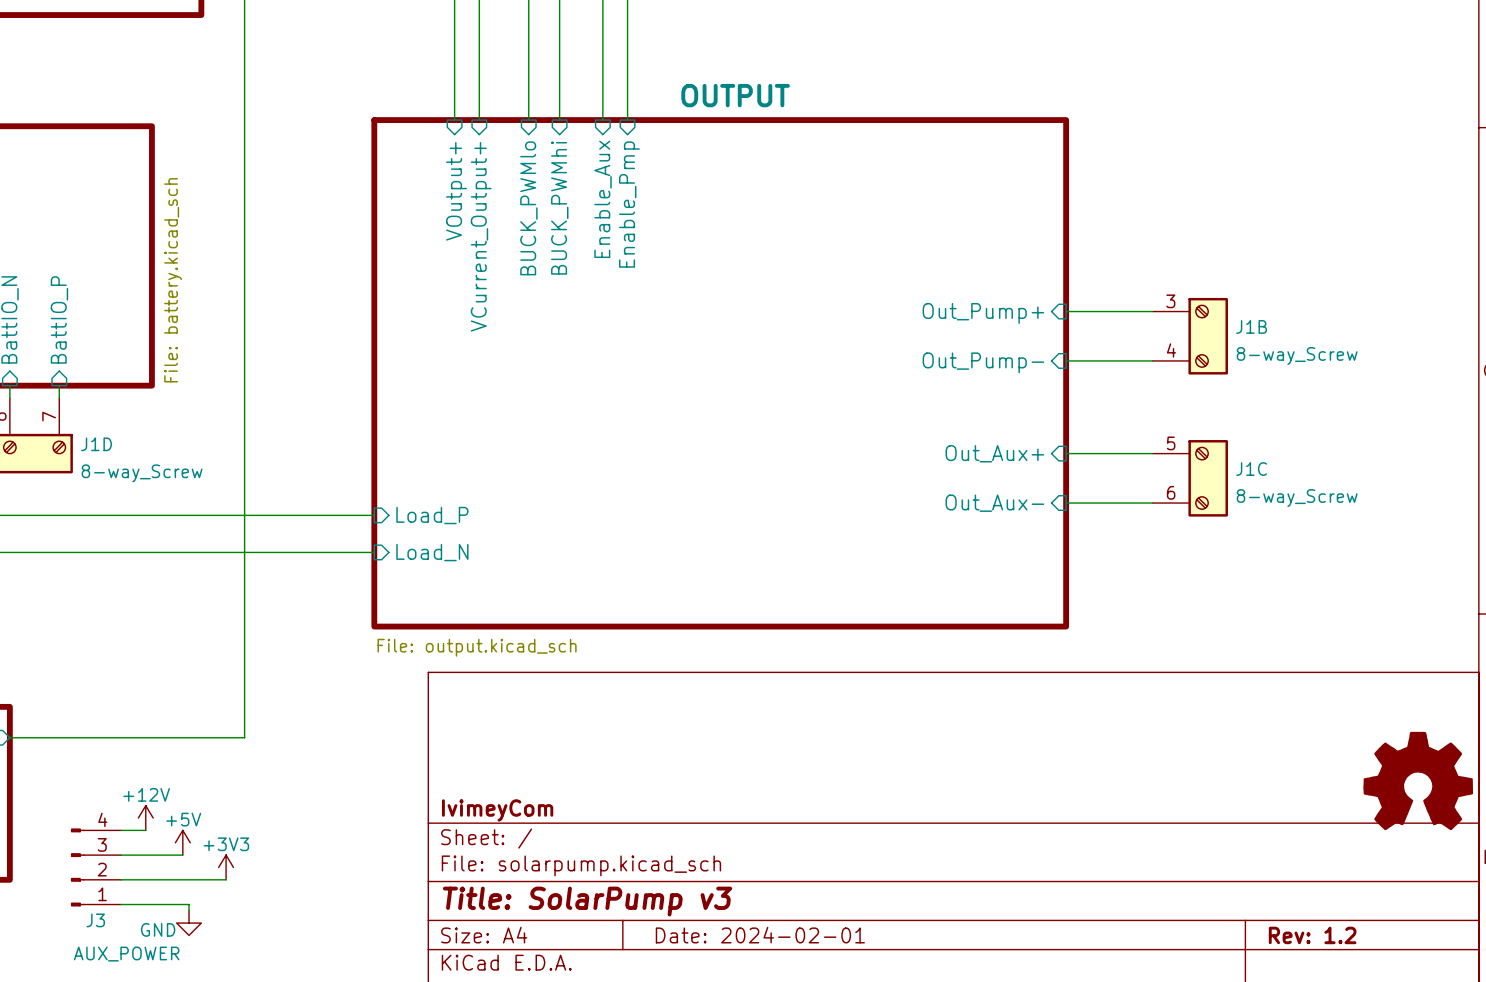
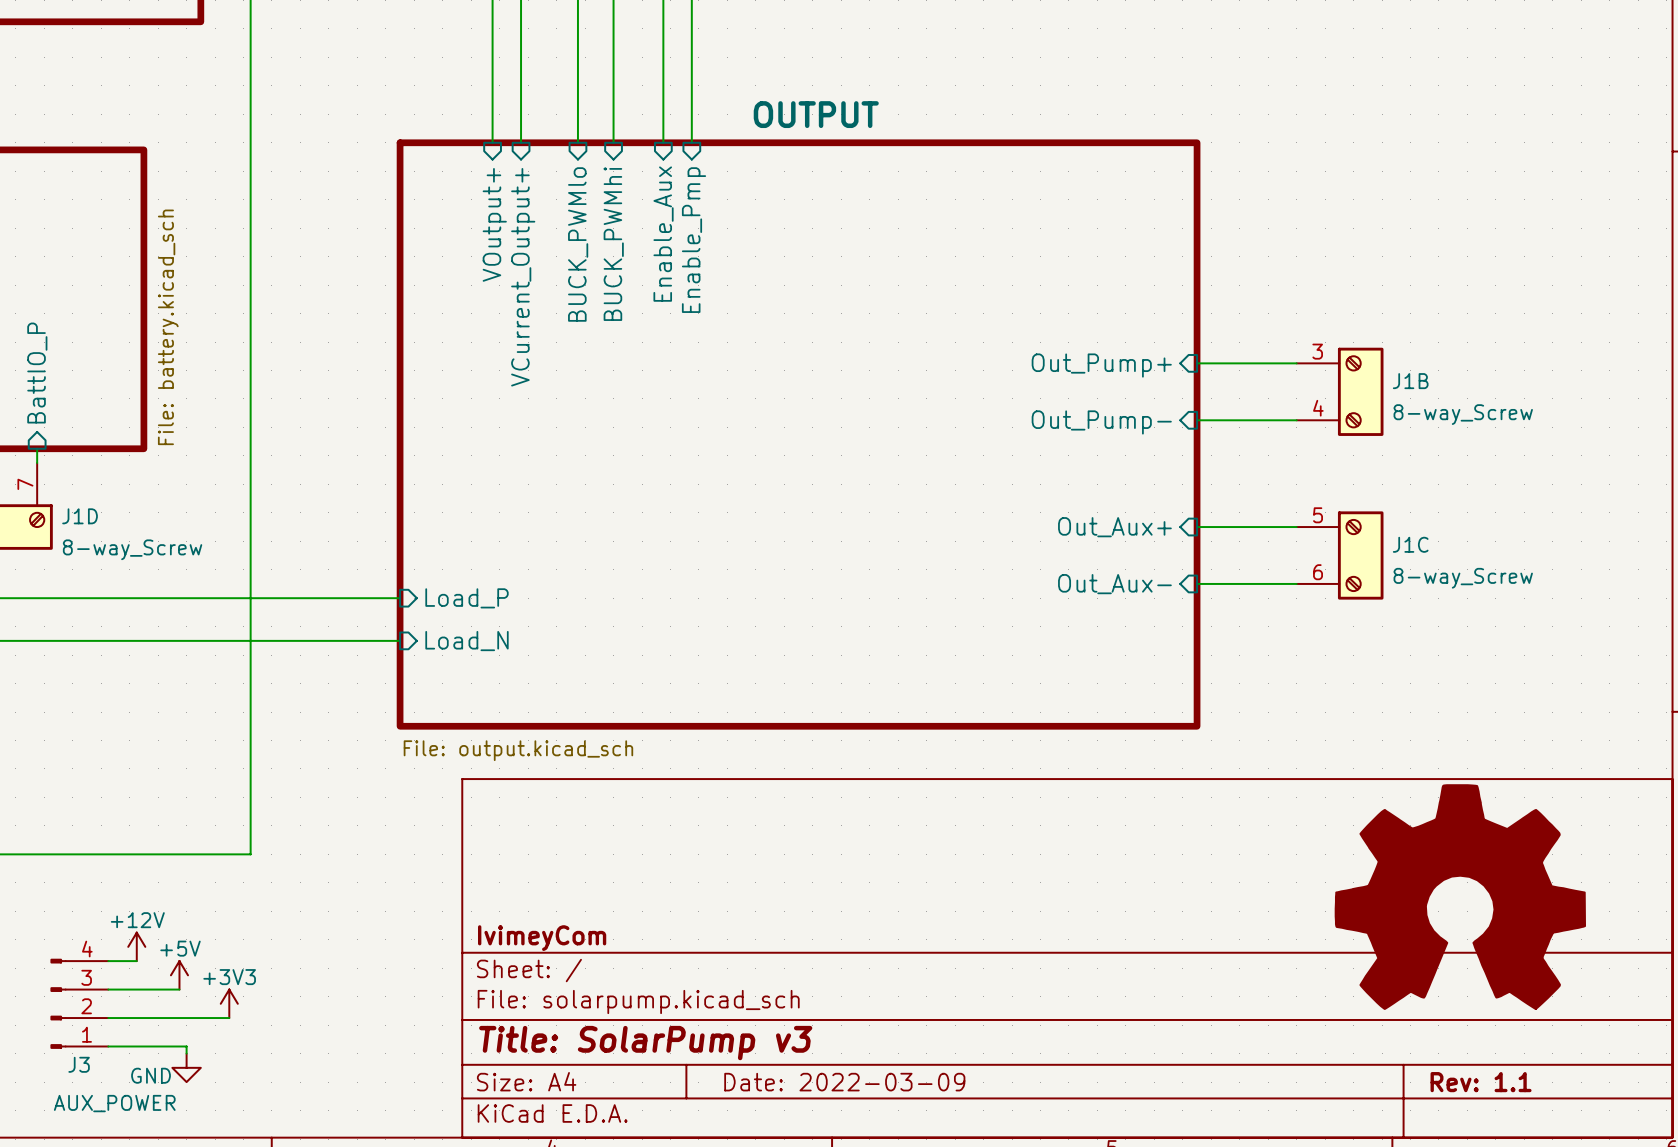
power symbol: none -> (1460, 897)
power symbol: (1418, 780) -> none
title block: Date: 2024-02-01 (760, 935) -> Date: 2022-03-09 (844, 1082)
title block: Rev: 1.2 (1312, 935) -> Rev: 1.1 (1481, 1082)

